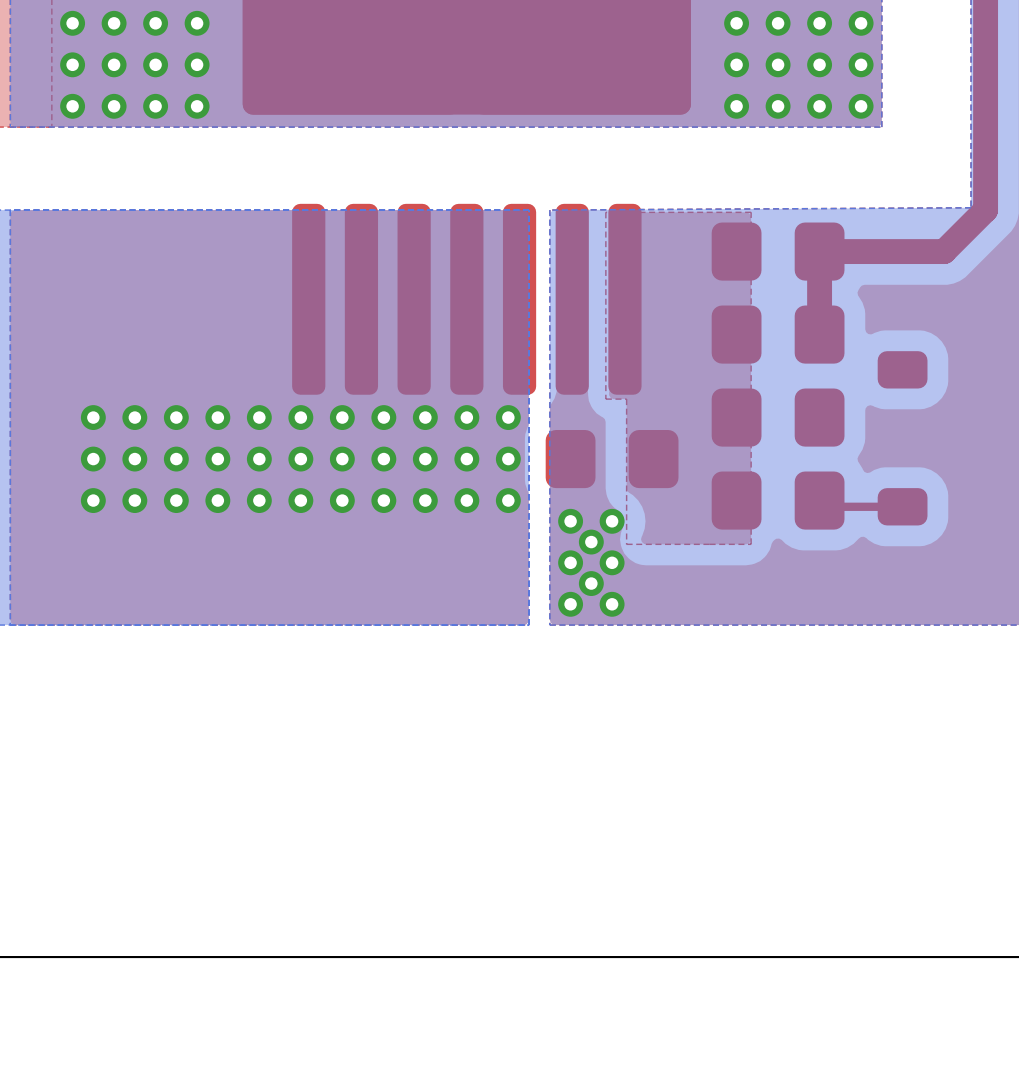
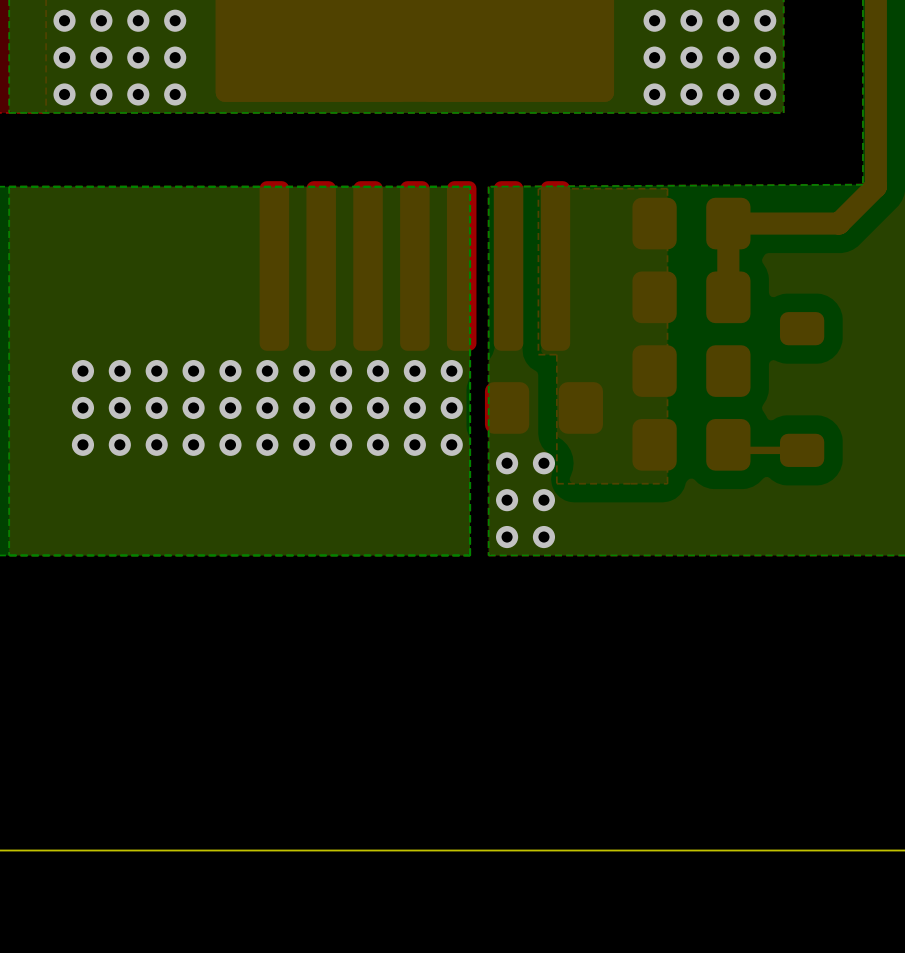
via: (591, 542) -> none
via: (591, 583) -> none

